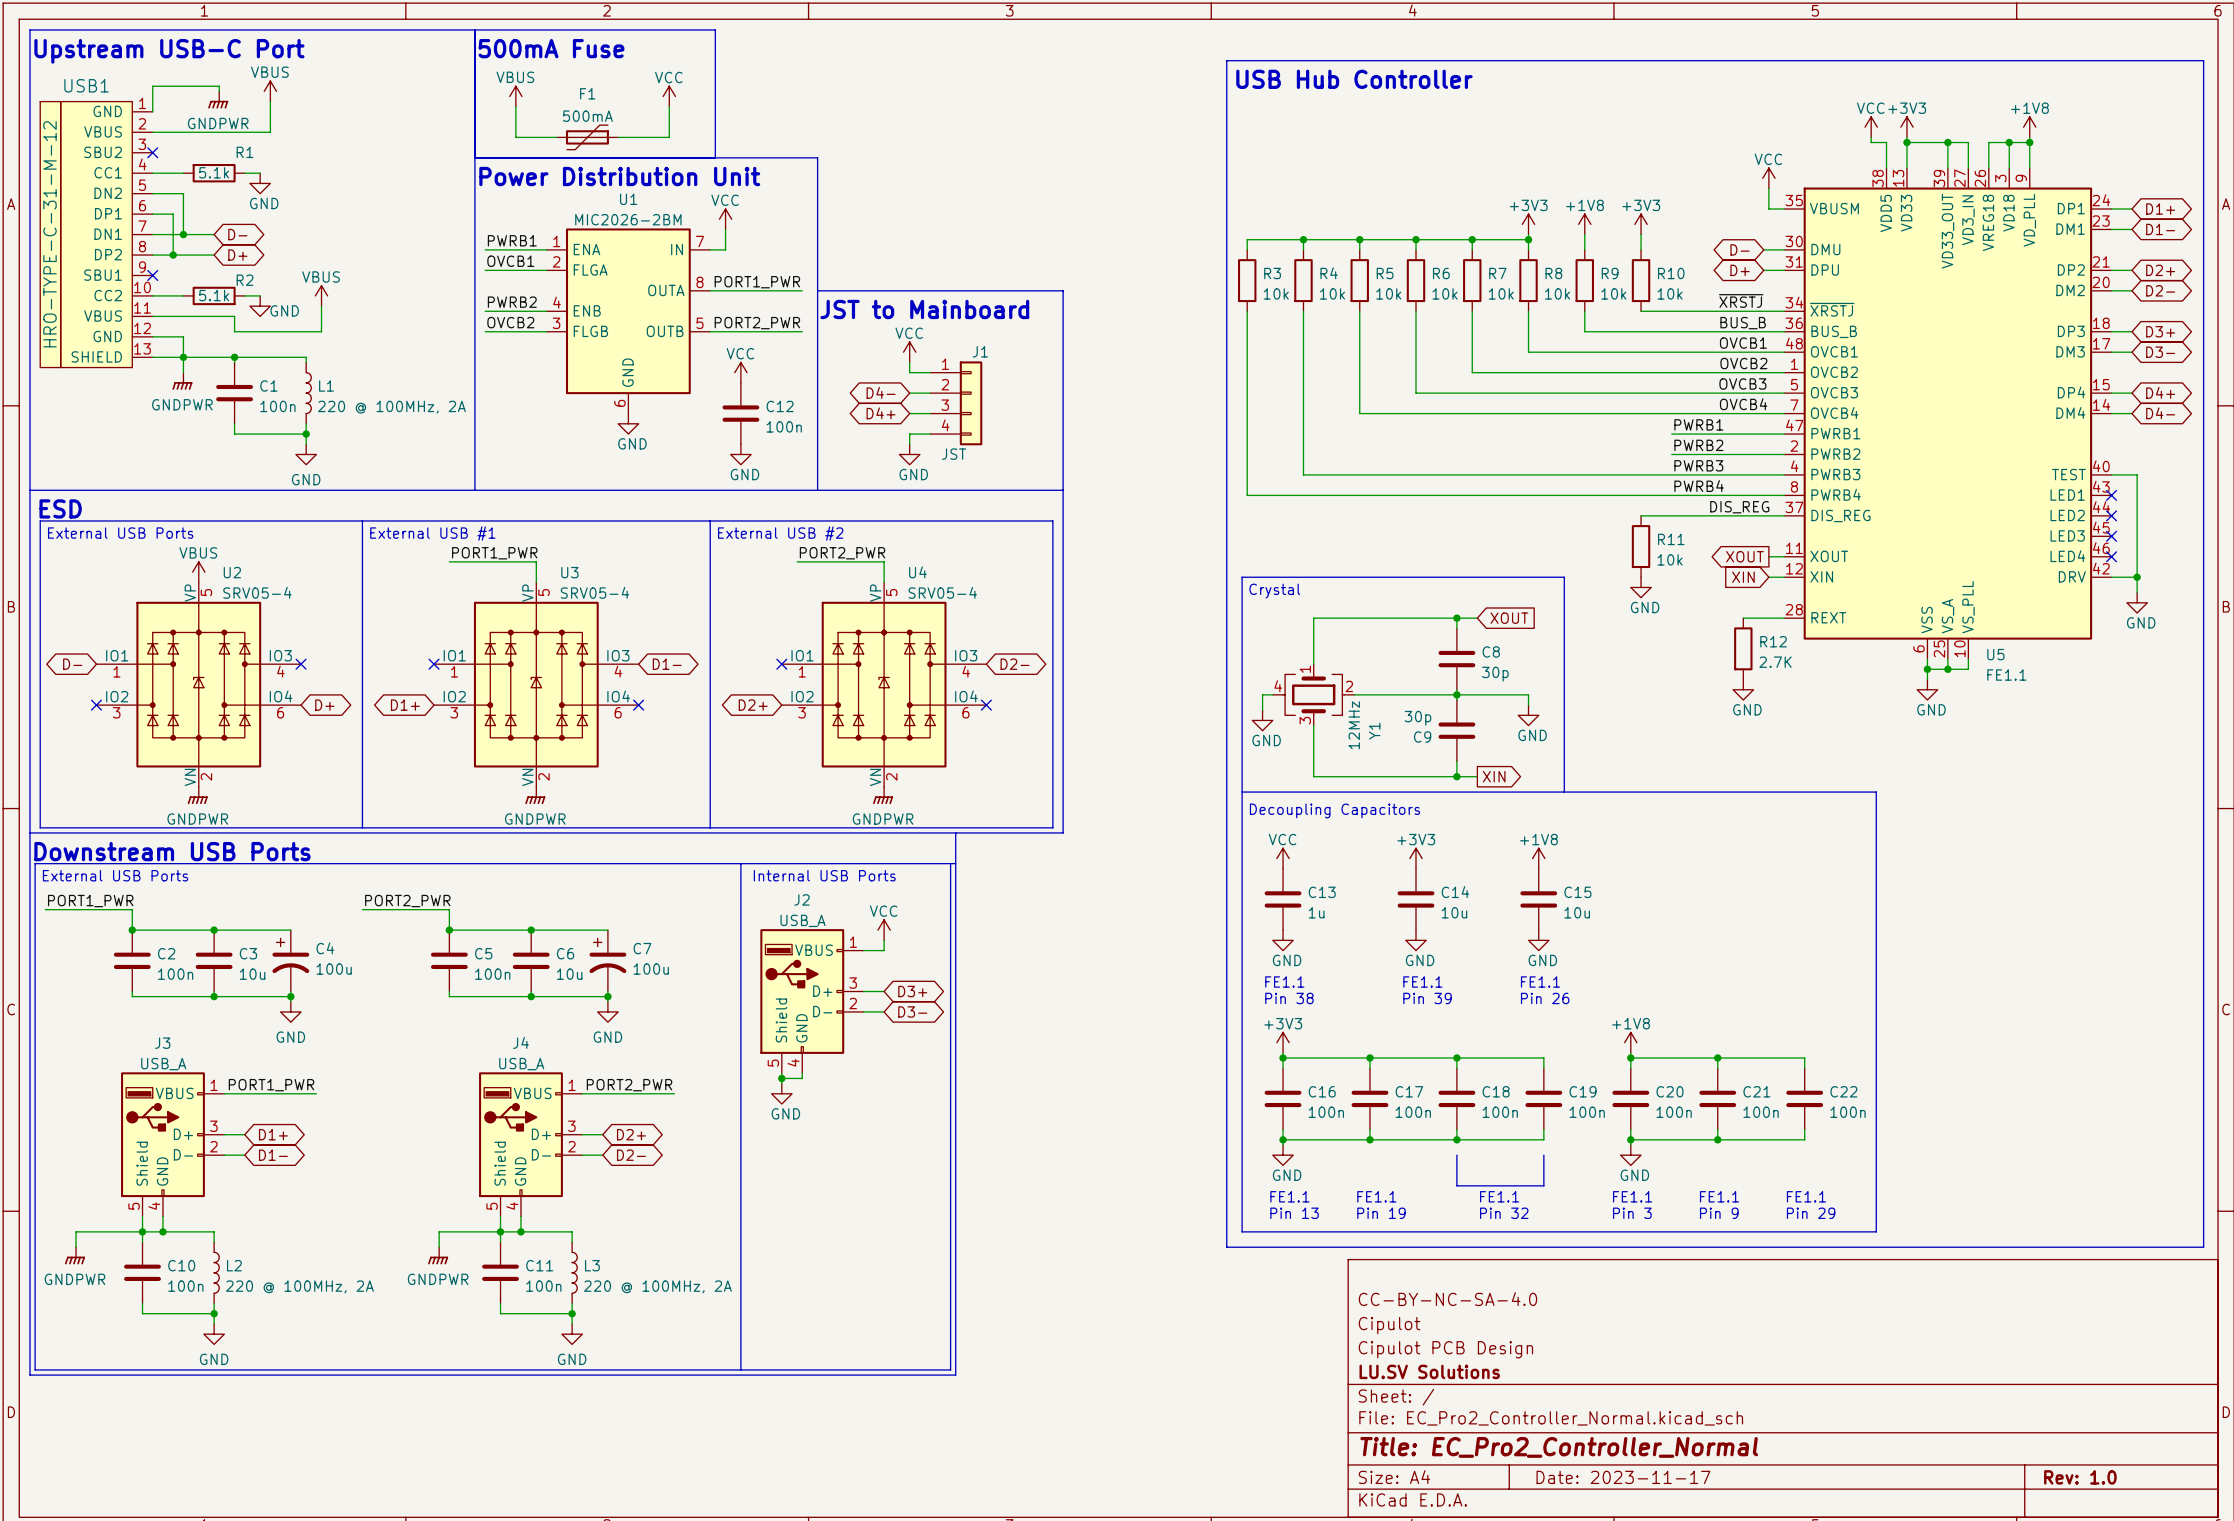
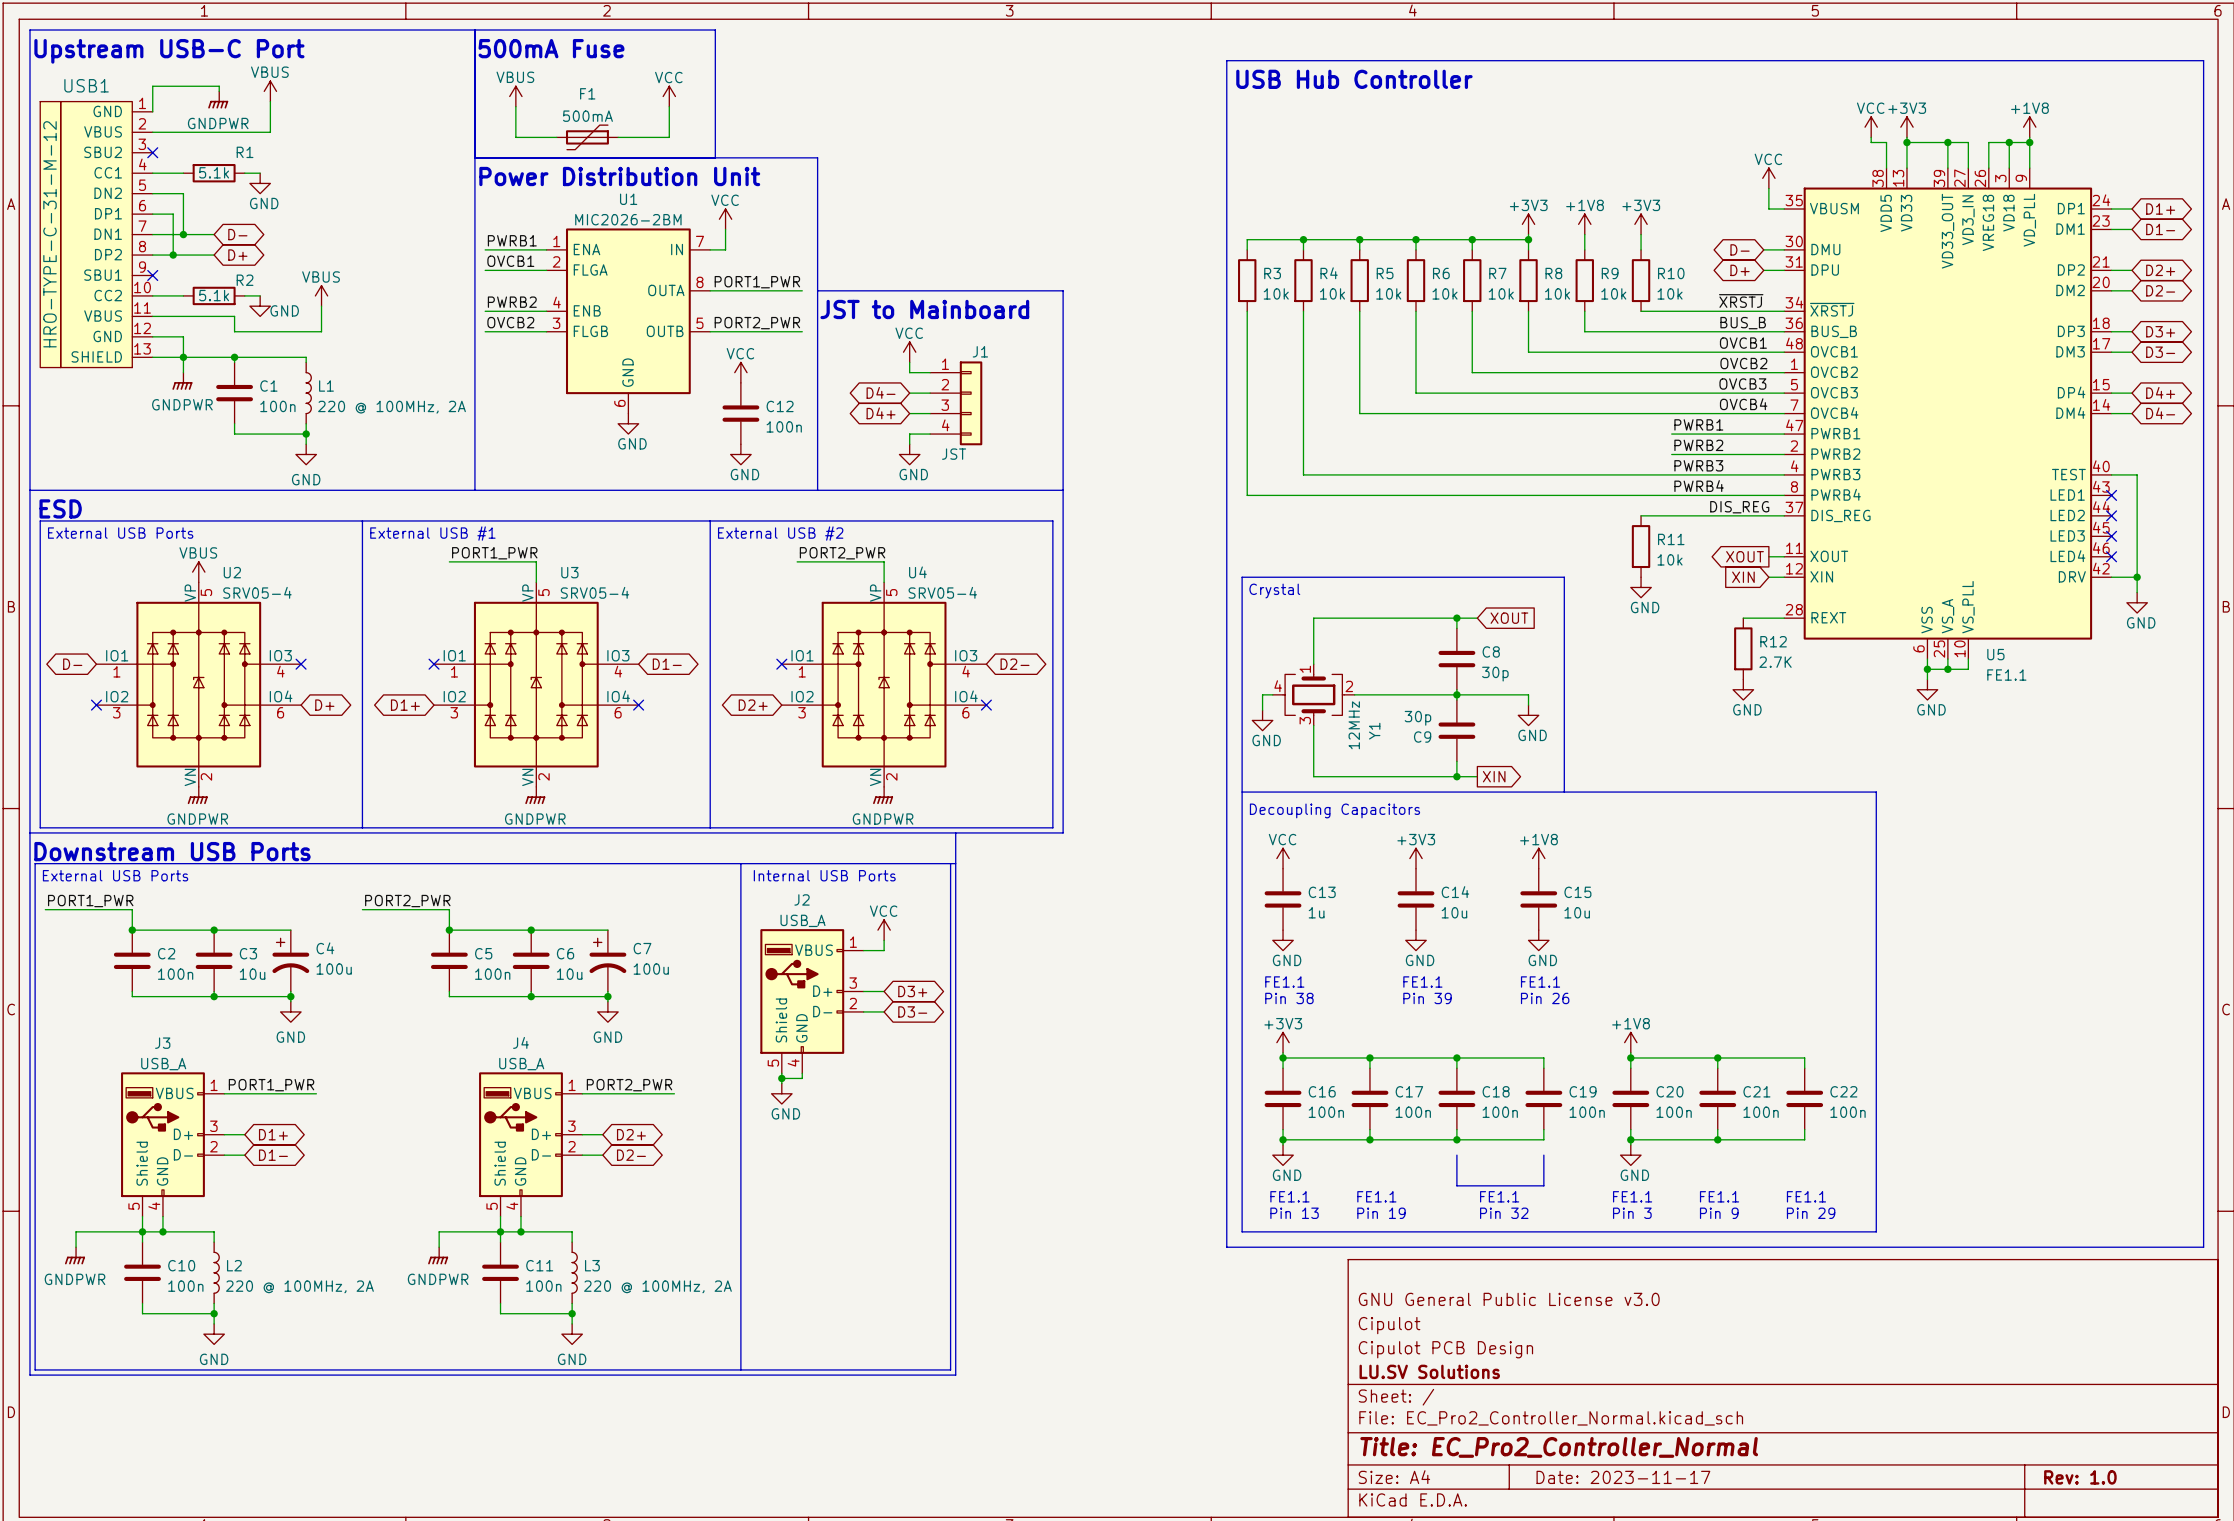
title block: CC-BY-NC-SA-4.0 (1447, 1299) -> GNU General Public License v3.0 (1509, 1299)

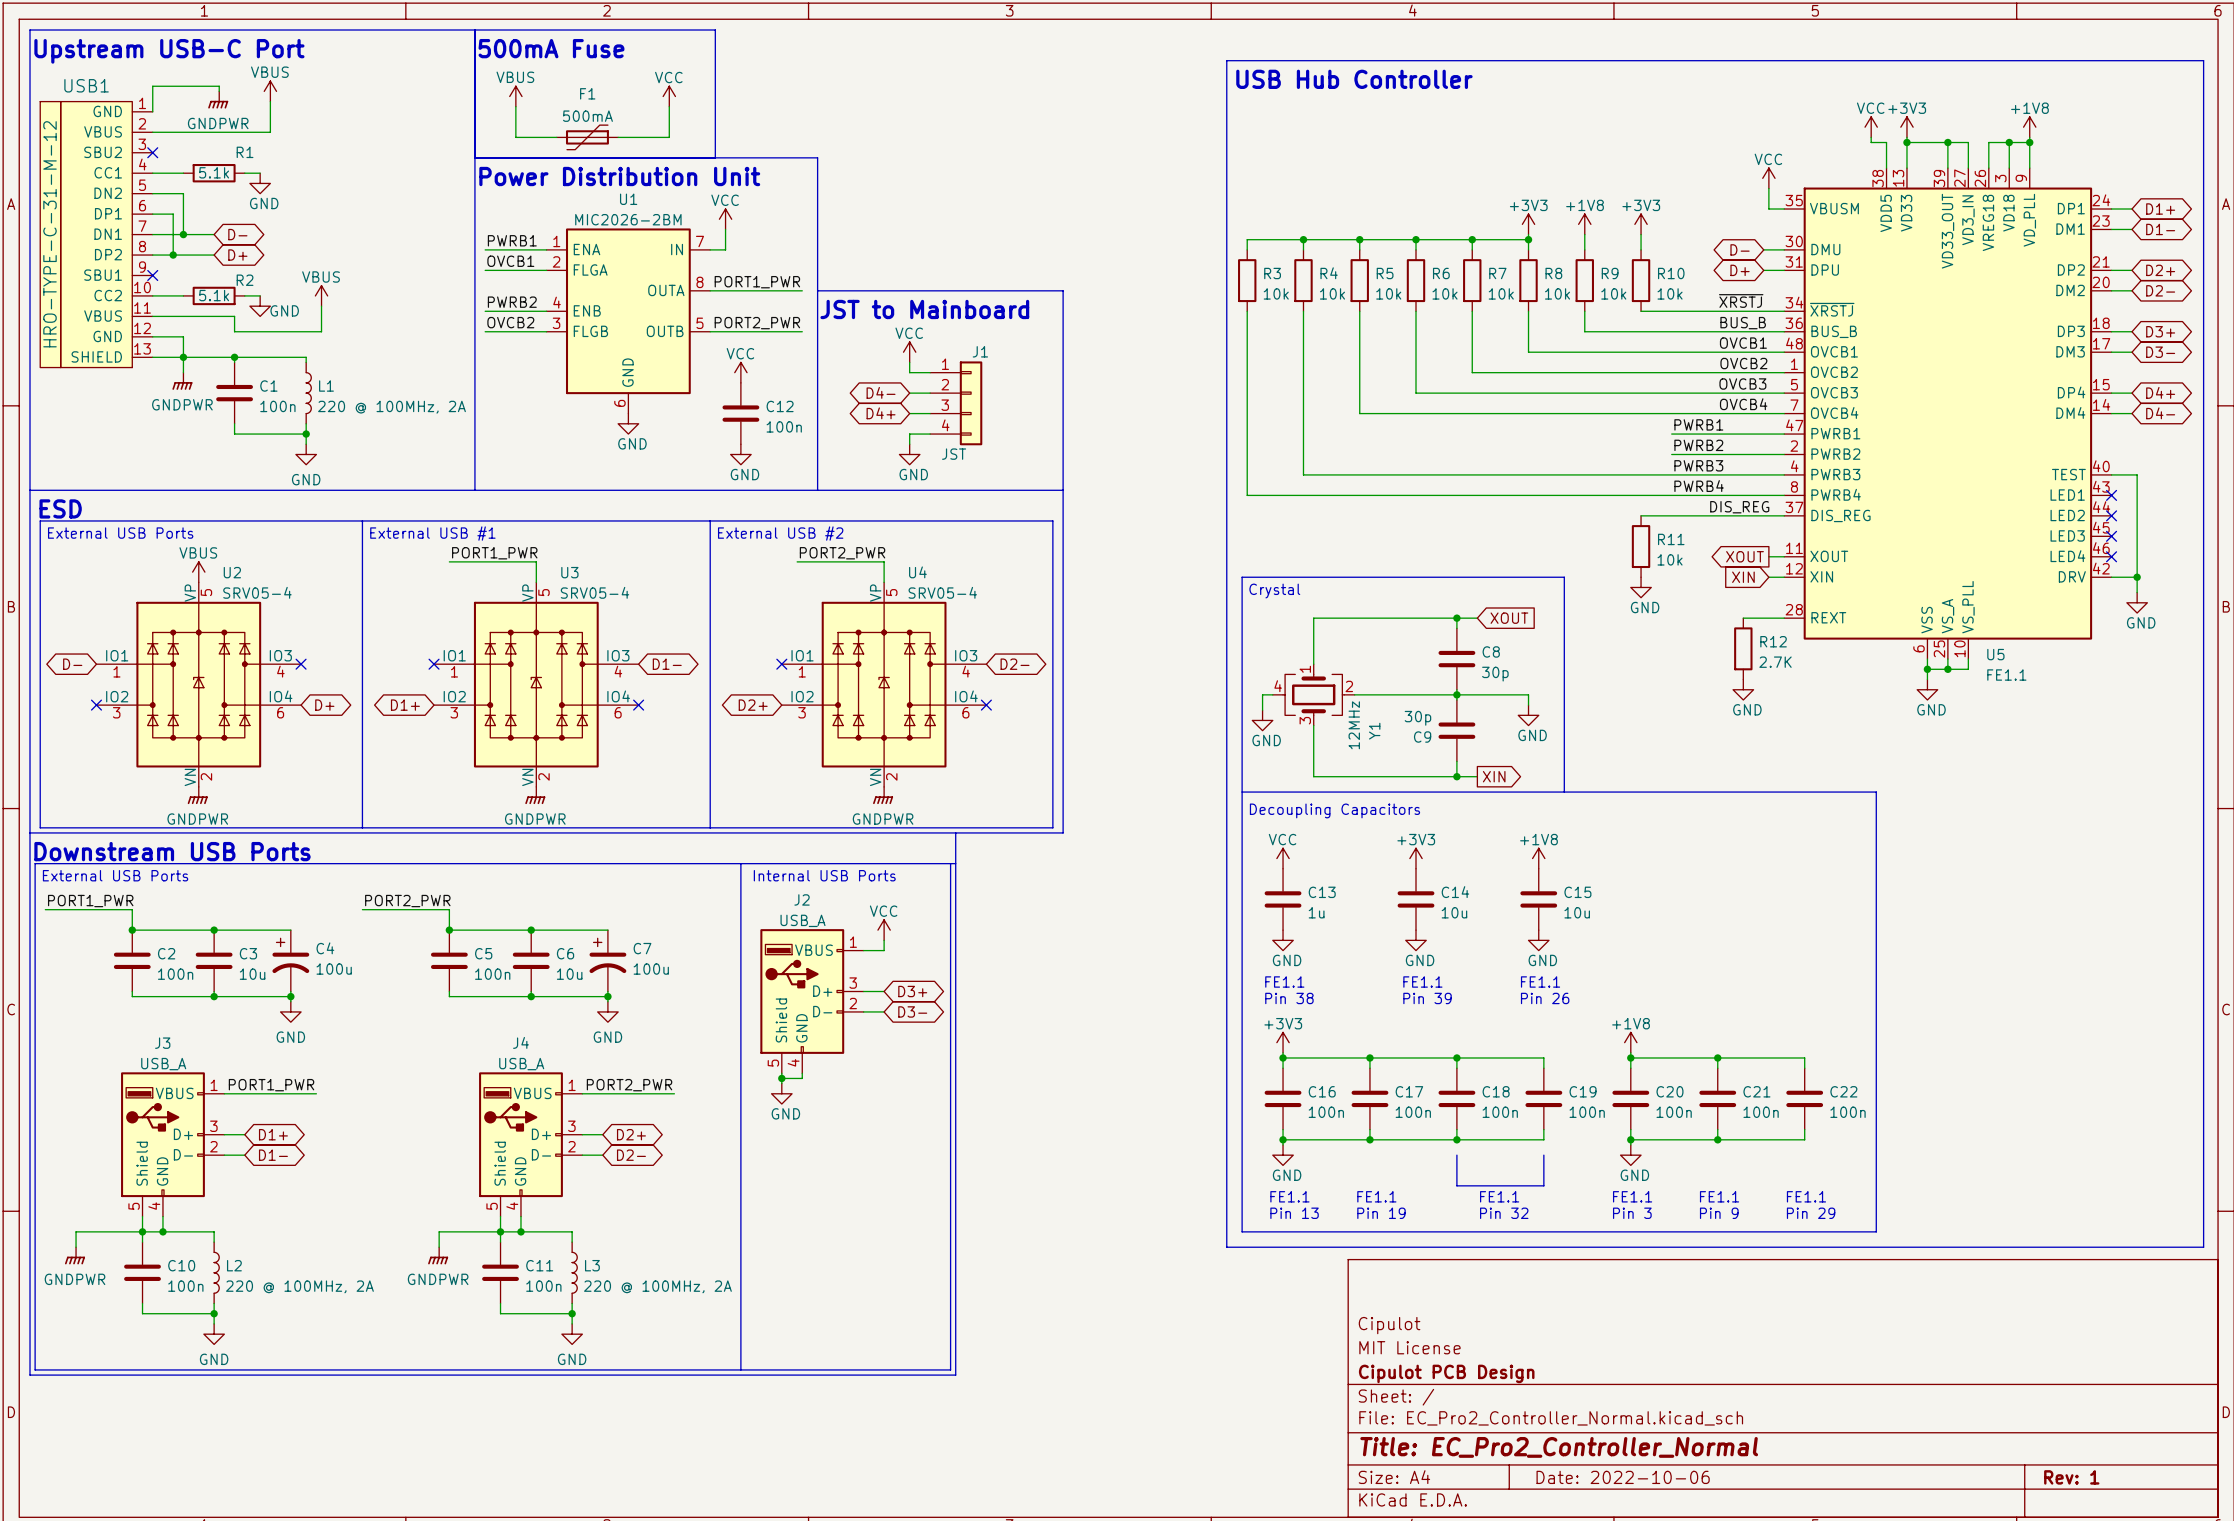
title block: GNU General Public License v3.0 (1509, 1299) -> none
title block: Cipulot PCB Design (1445, 1349) -> MIT License (1409, 1347)
title block: LU.SV Solutions (1429, 1371) -> Cipulot PCB Design (1446, 1373)
title block: Date: 2023-11-17 (1623, 1477) -> Date: 2022-10-06 (1623, 1477)
title block: Rev: 1.0 (2080, 1477) -> Rev: 1 (2071, 1477)

